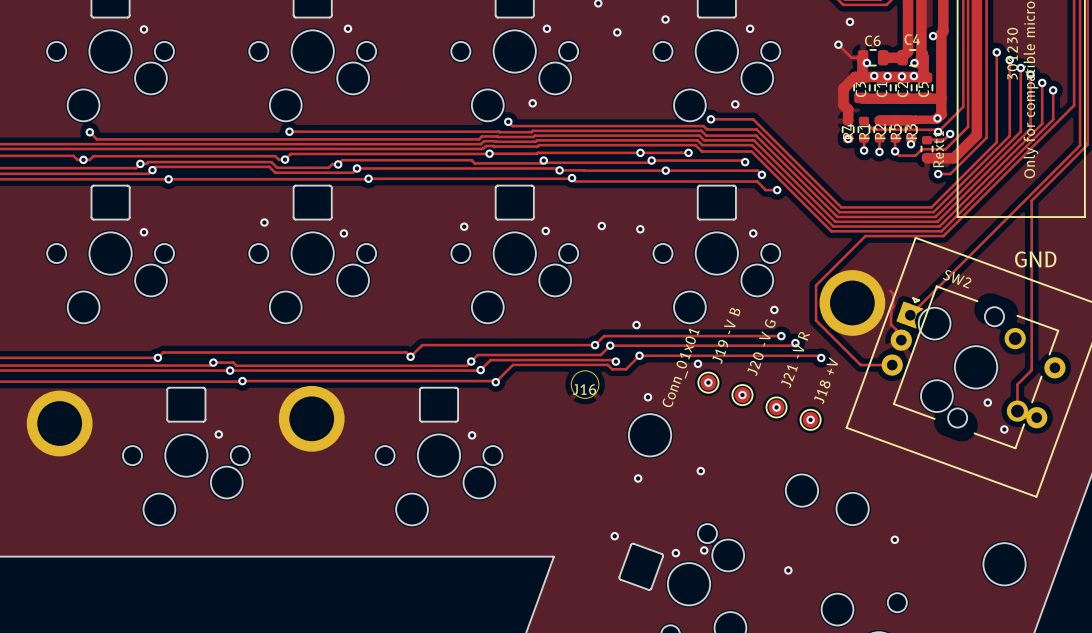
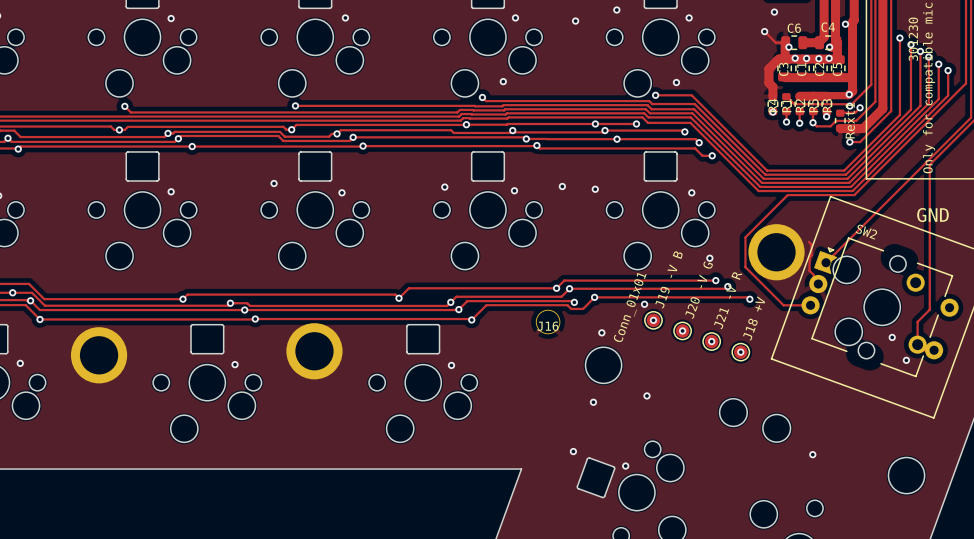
via: (636, 325) -> none
via: (704, 550) -> none
via: (788, 570) -> none

